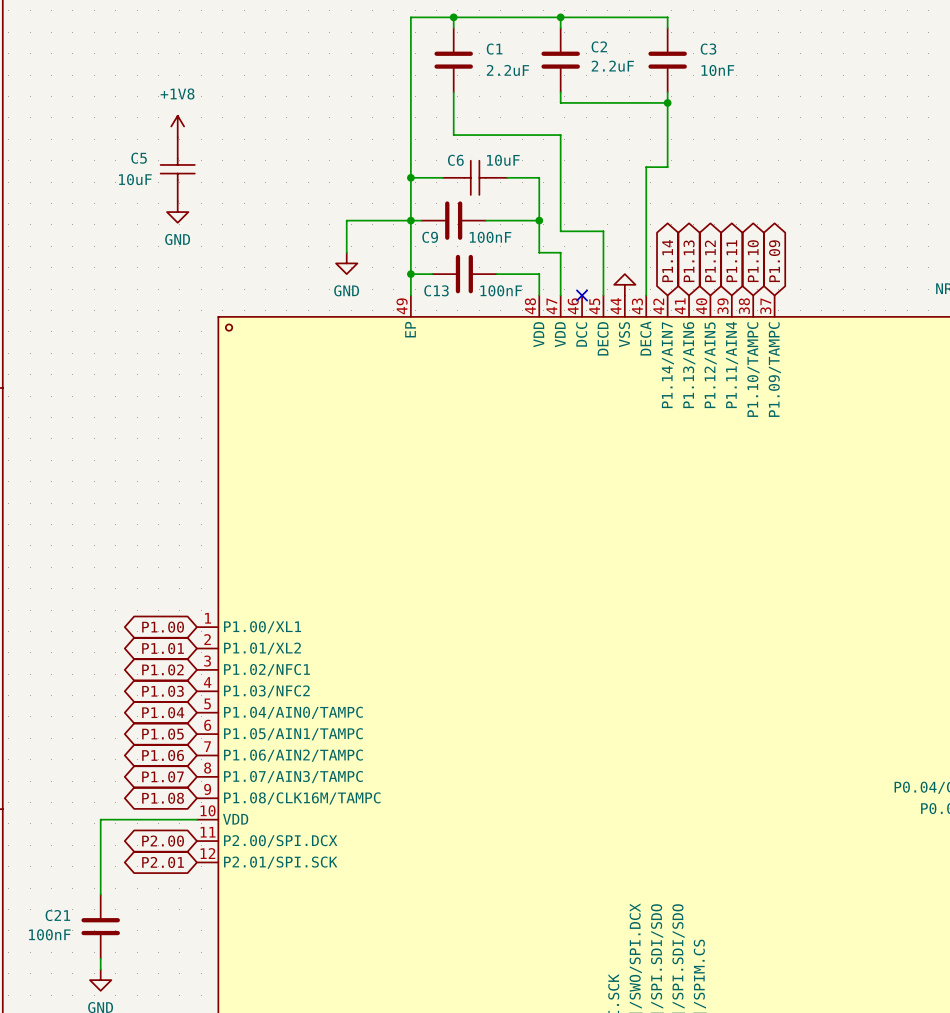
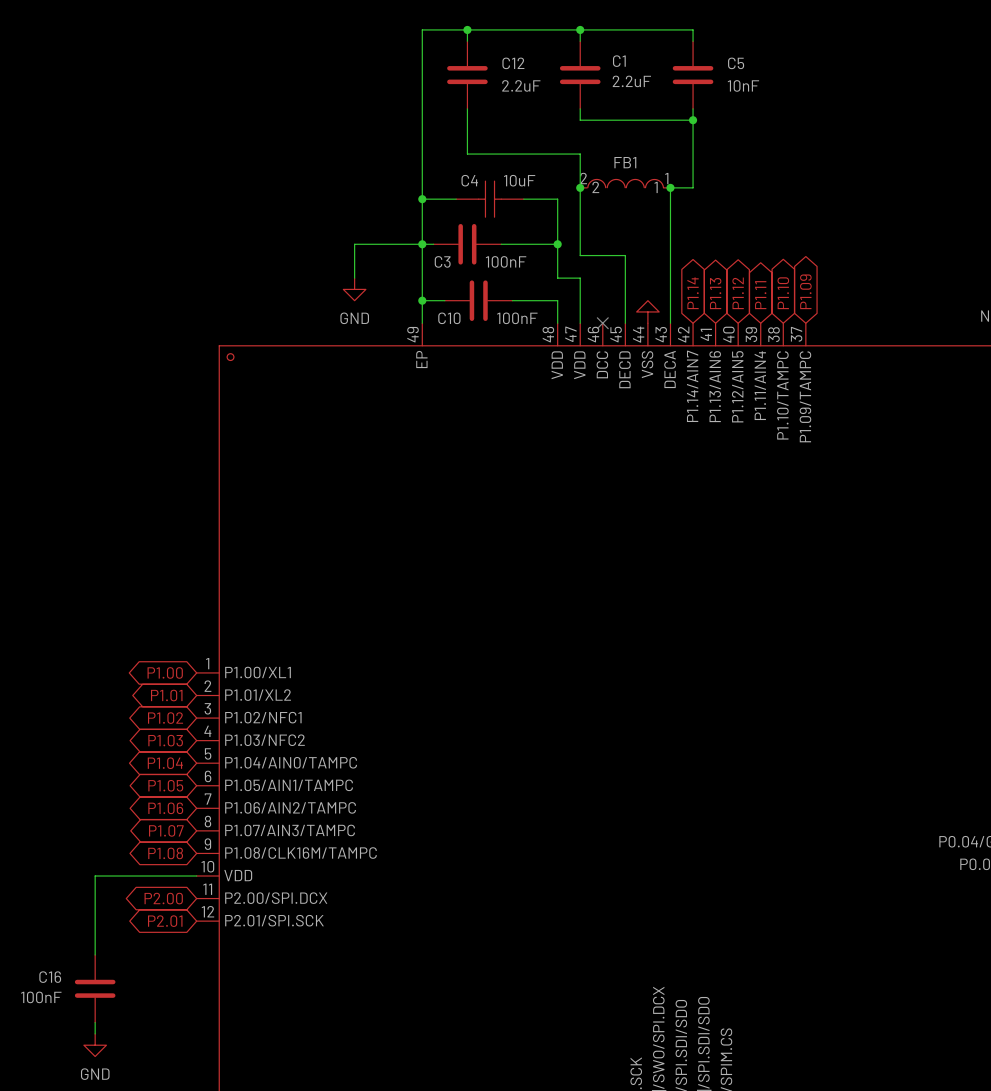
C2 name: C2 (599, 46) -> C1 (619, 61)
C1 name: C1 (494, 49) -> C12 (513, 63)
C3 name: C3 (708, 49) -> C5 (736, 63)
power symbol: +1V8 (177, 126) -> none
C6 name: C6 (455, 160) -> C4 (469, 180)
FB1: none -> (625, 183)
junction: none -> (580, 187)
junction: none -> (670, 187)
C5: 10uF (177, 169) -> none
power symbol: GND (177, 212) -> none
C9 name: C9 (430, 237) -> C3 (442, 261)
C13 name: C13 (436, 290) -> C10 (449, 318)
C21 name: C21 (57, 915) -> C16 (50, 977)

